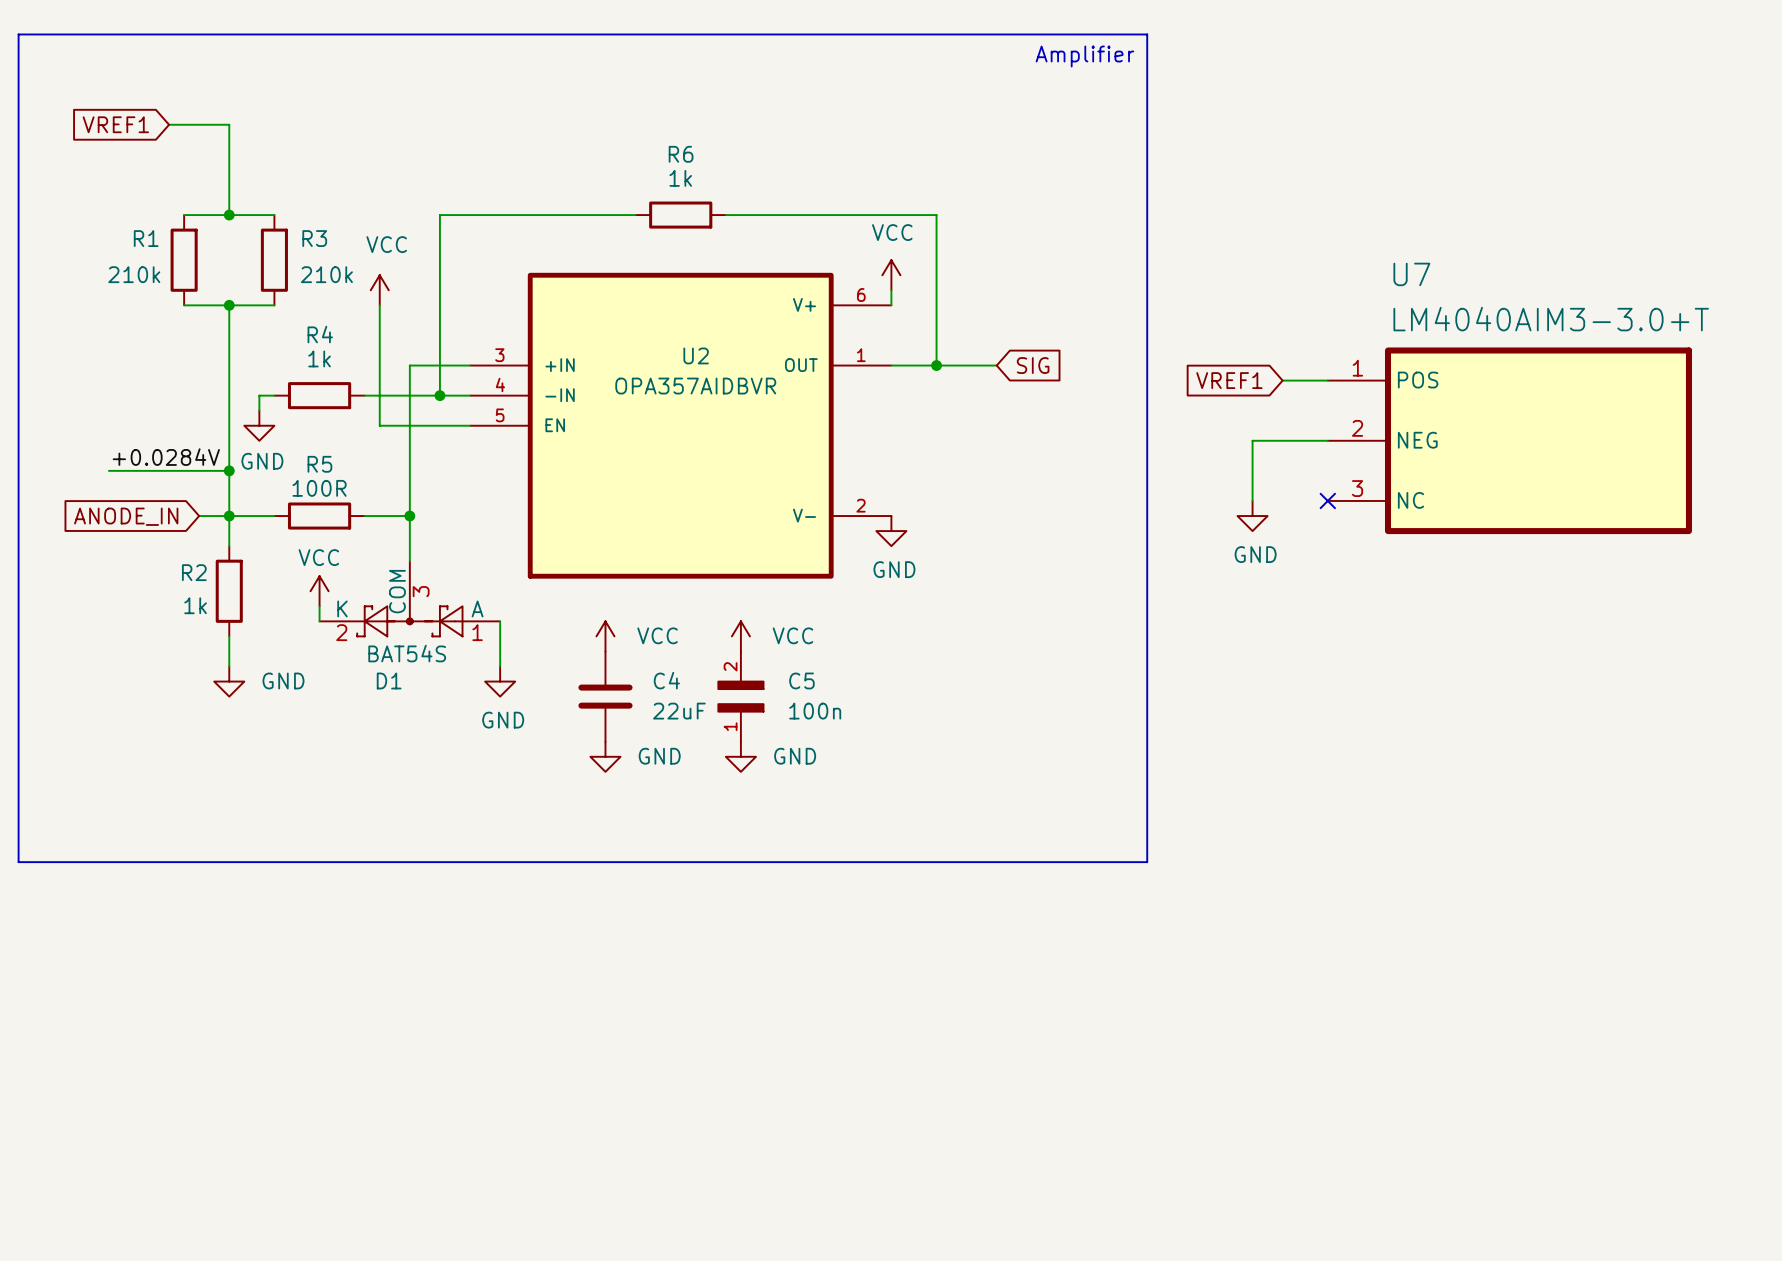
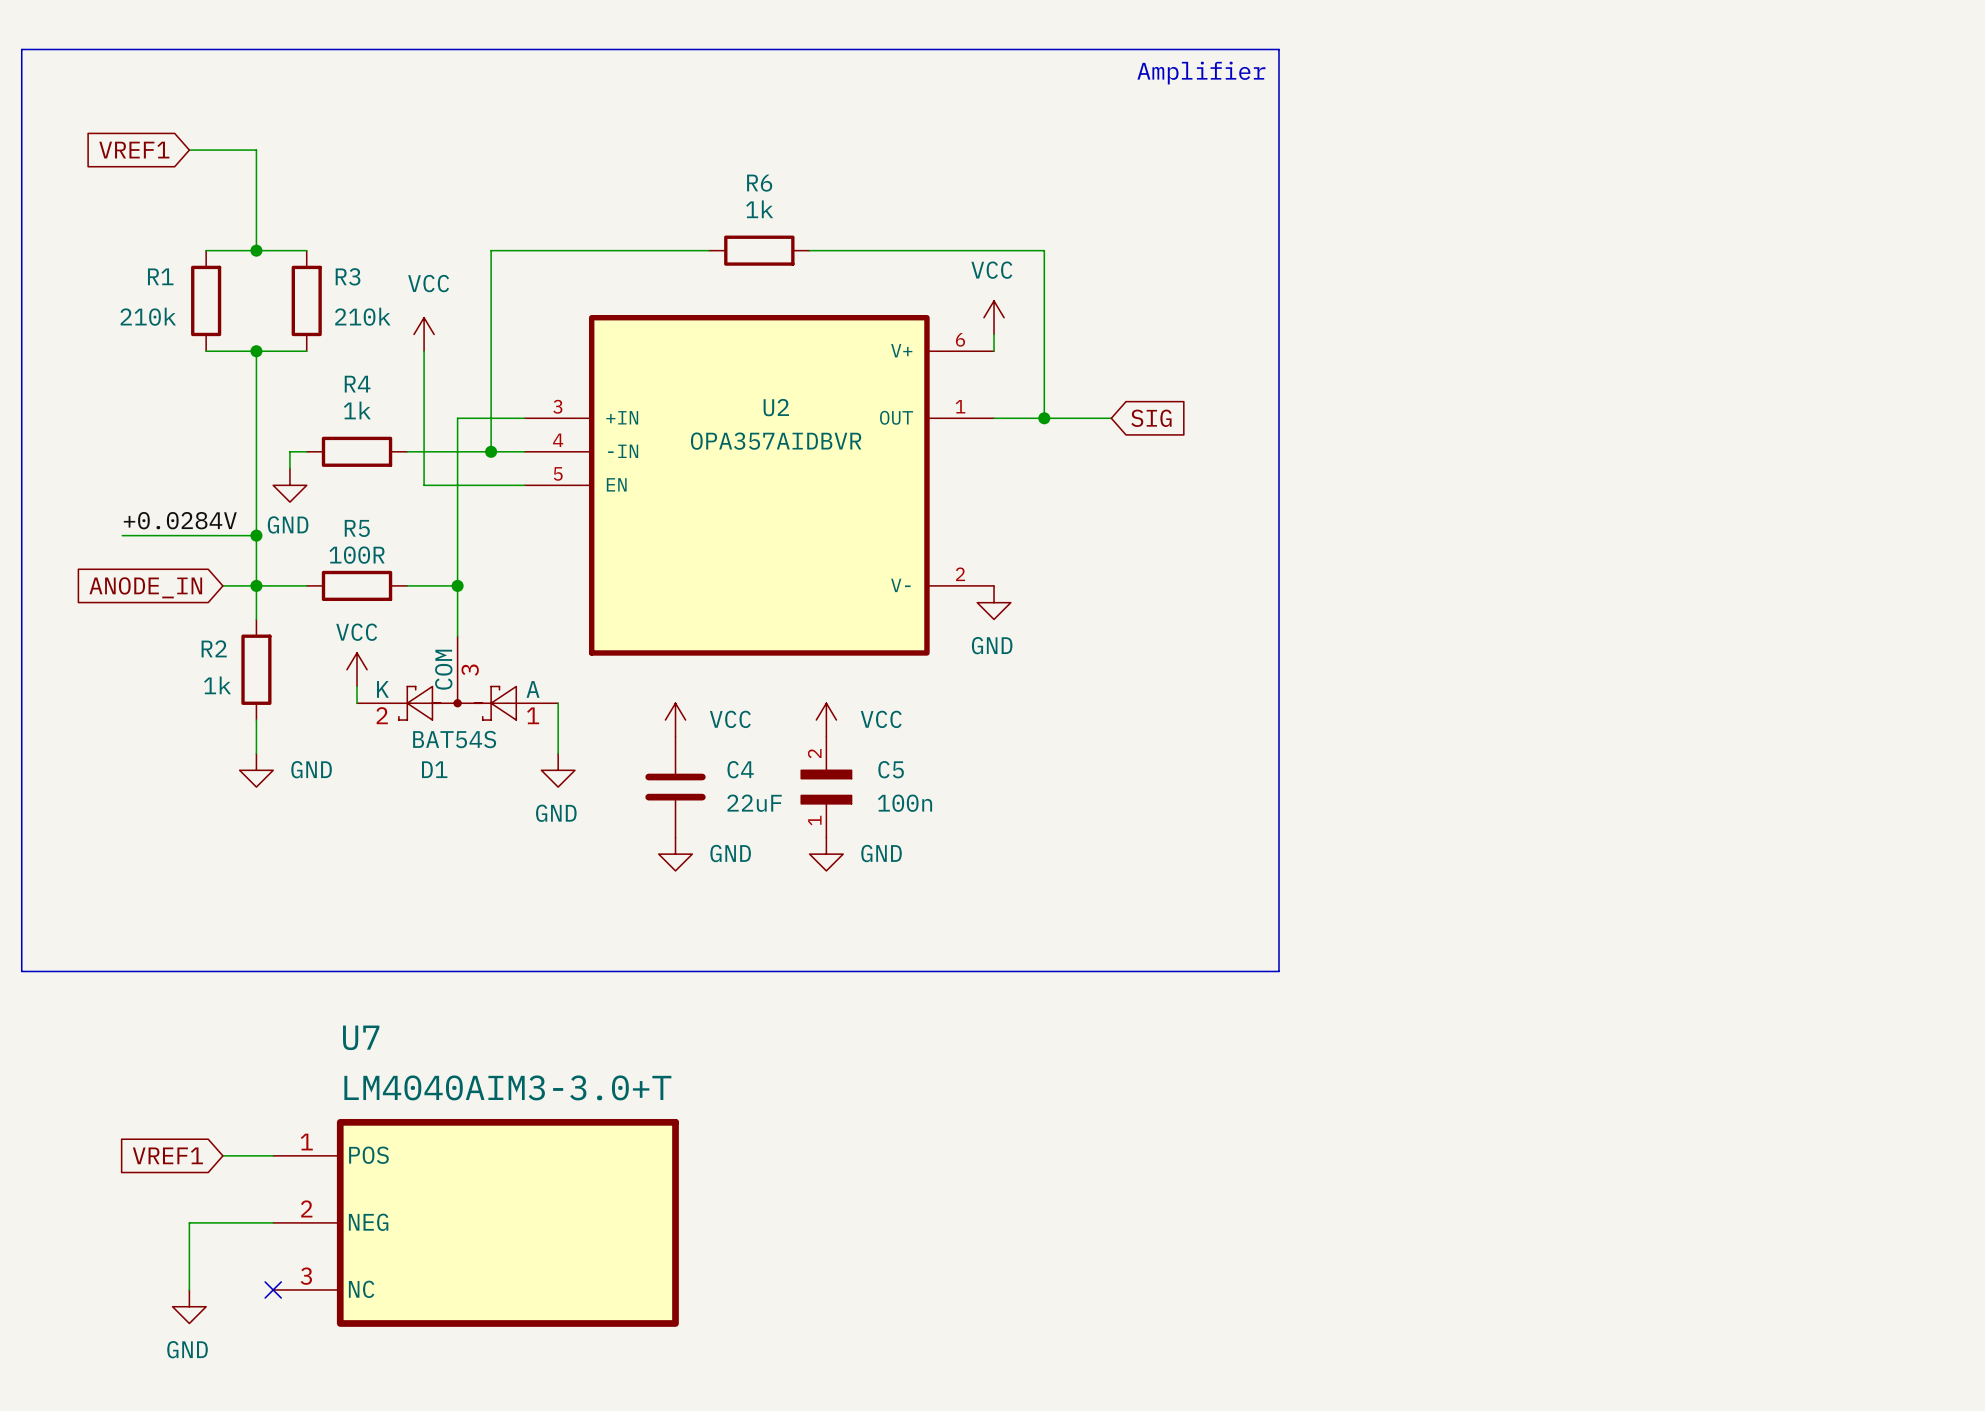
global label: VREF1 (1229, 380) -> none
wire: (1282, 380) (1327, 380) -> none
wire: (1327, 440) (1252, 440) (1252, 500) -> none
U7 position: (1509, 440) -> (476, 1222)
no-connect mark: (1327, 500) -> none
power symbol: GND (1252, 516) -> none
global label: none -> VREF1 (167, 1155)
wire: none -> (222, 1155) (273, 1155)
wire: none -> (273, 1222) (189, 1222) (189, 1289)
no-connect mark: none -> (273, 1289)
power symbol: none -> GND (189, 1306)

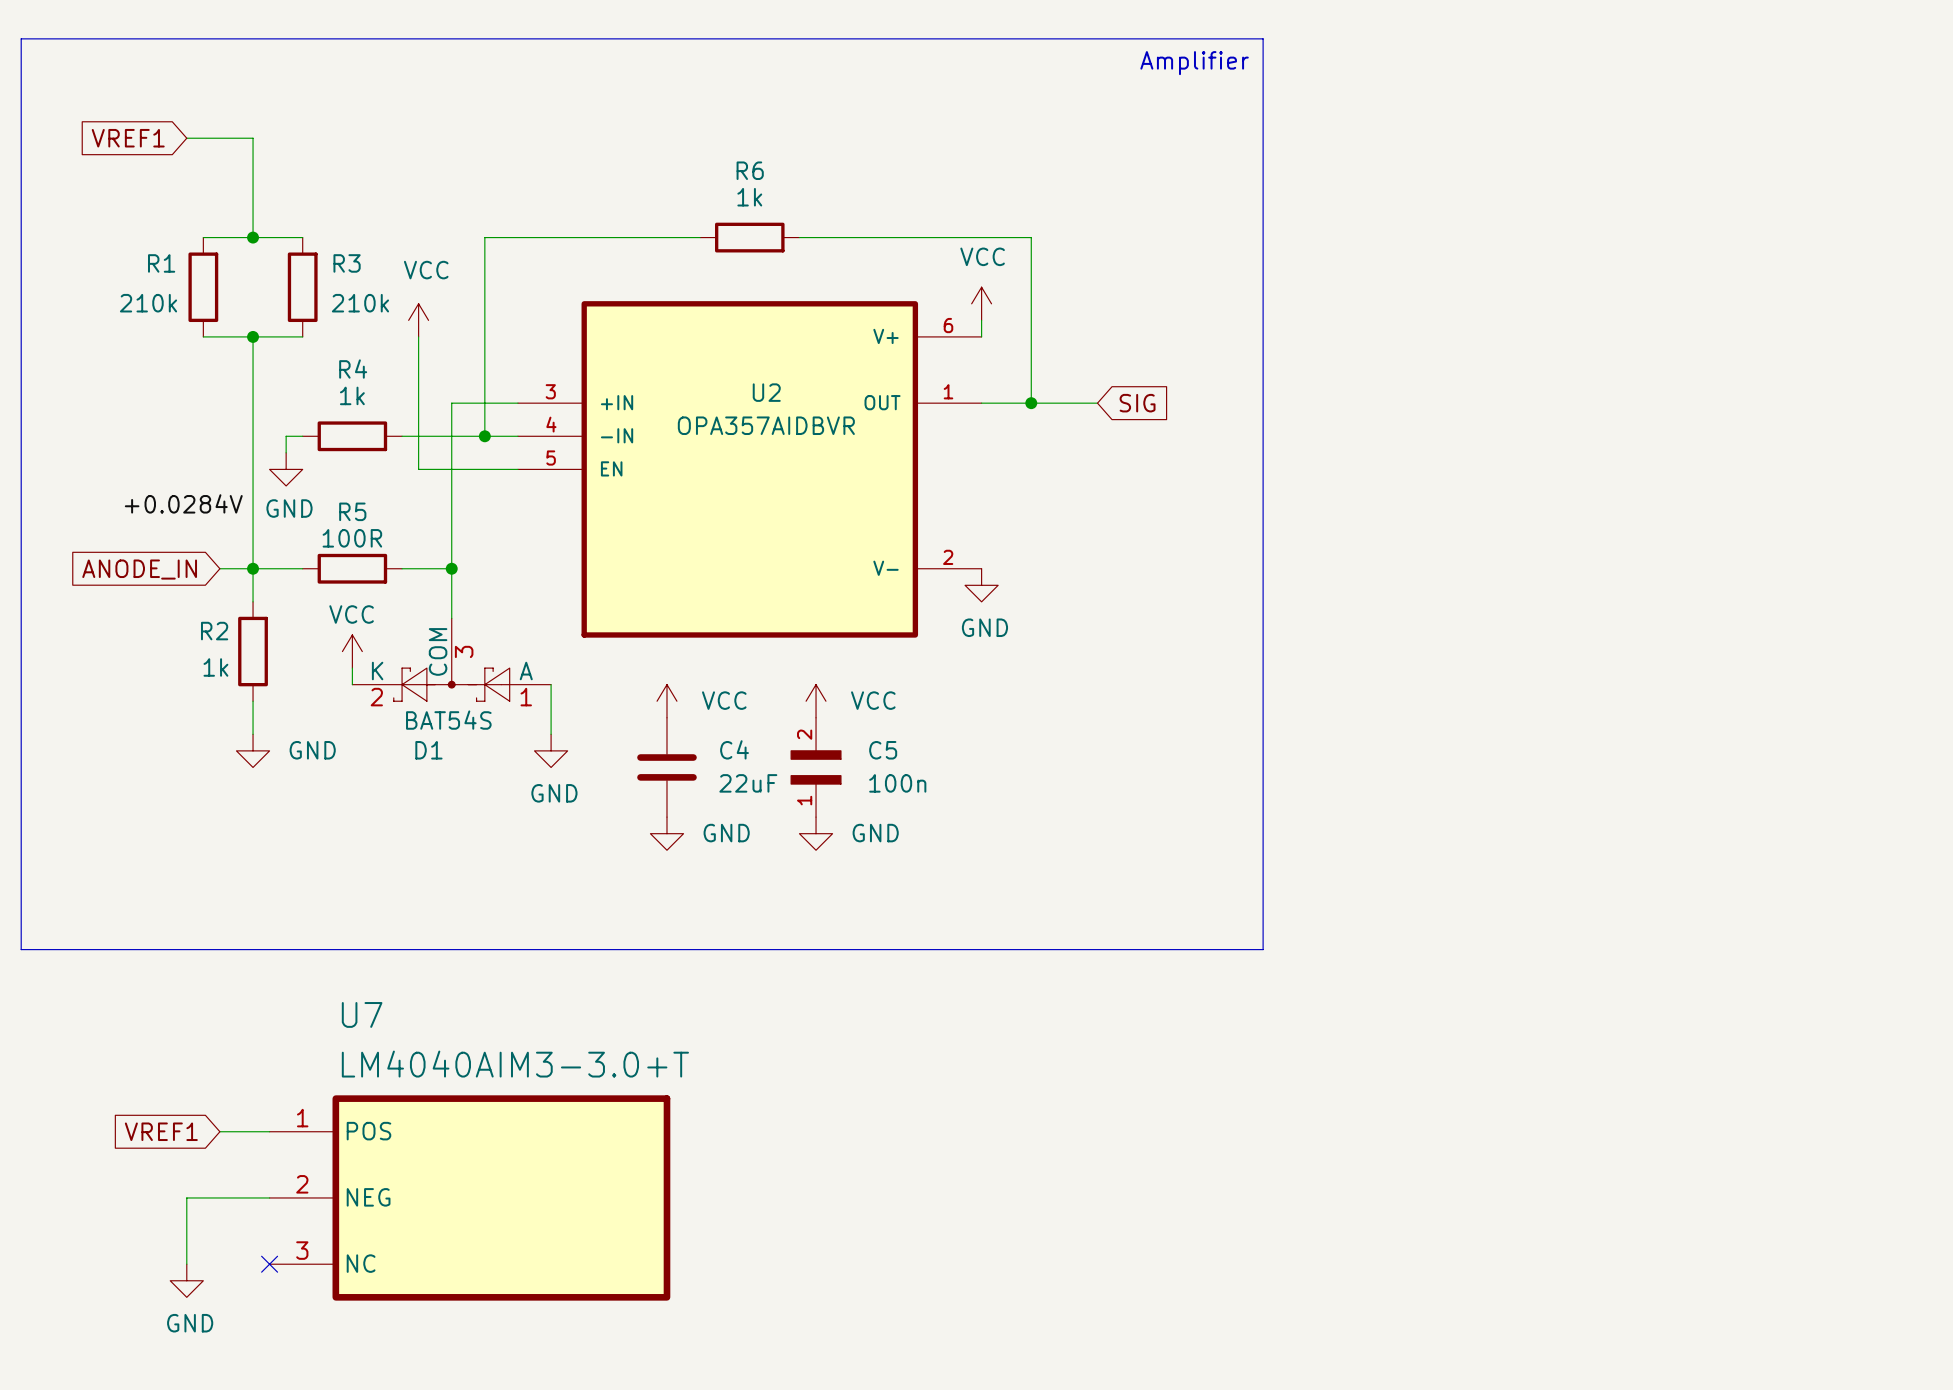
wire: (122, 535) (256, 535) -> none
junction: (256, 535) -> none

